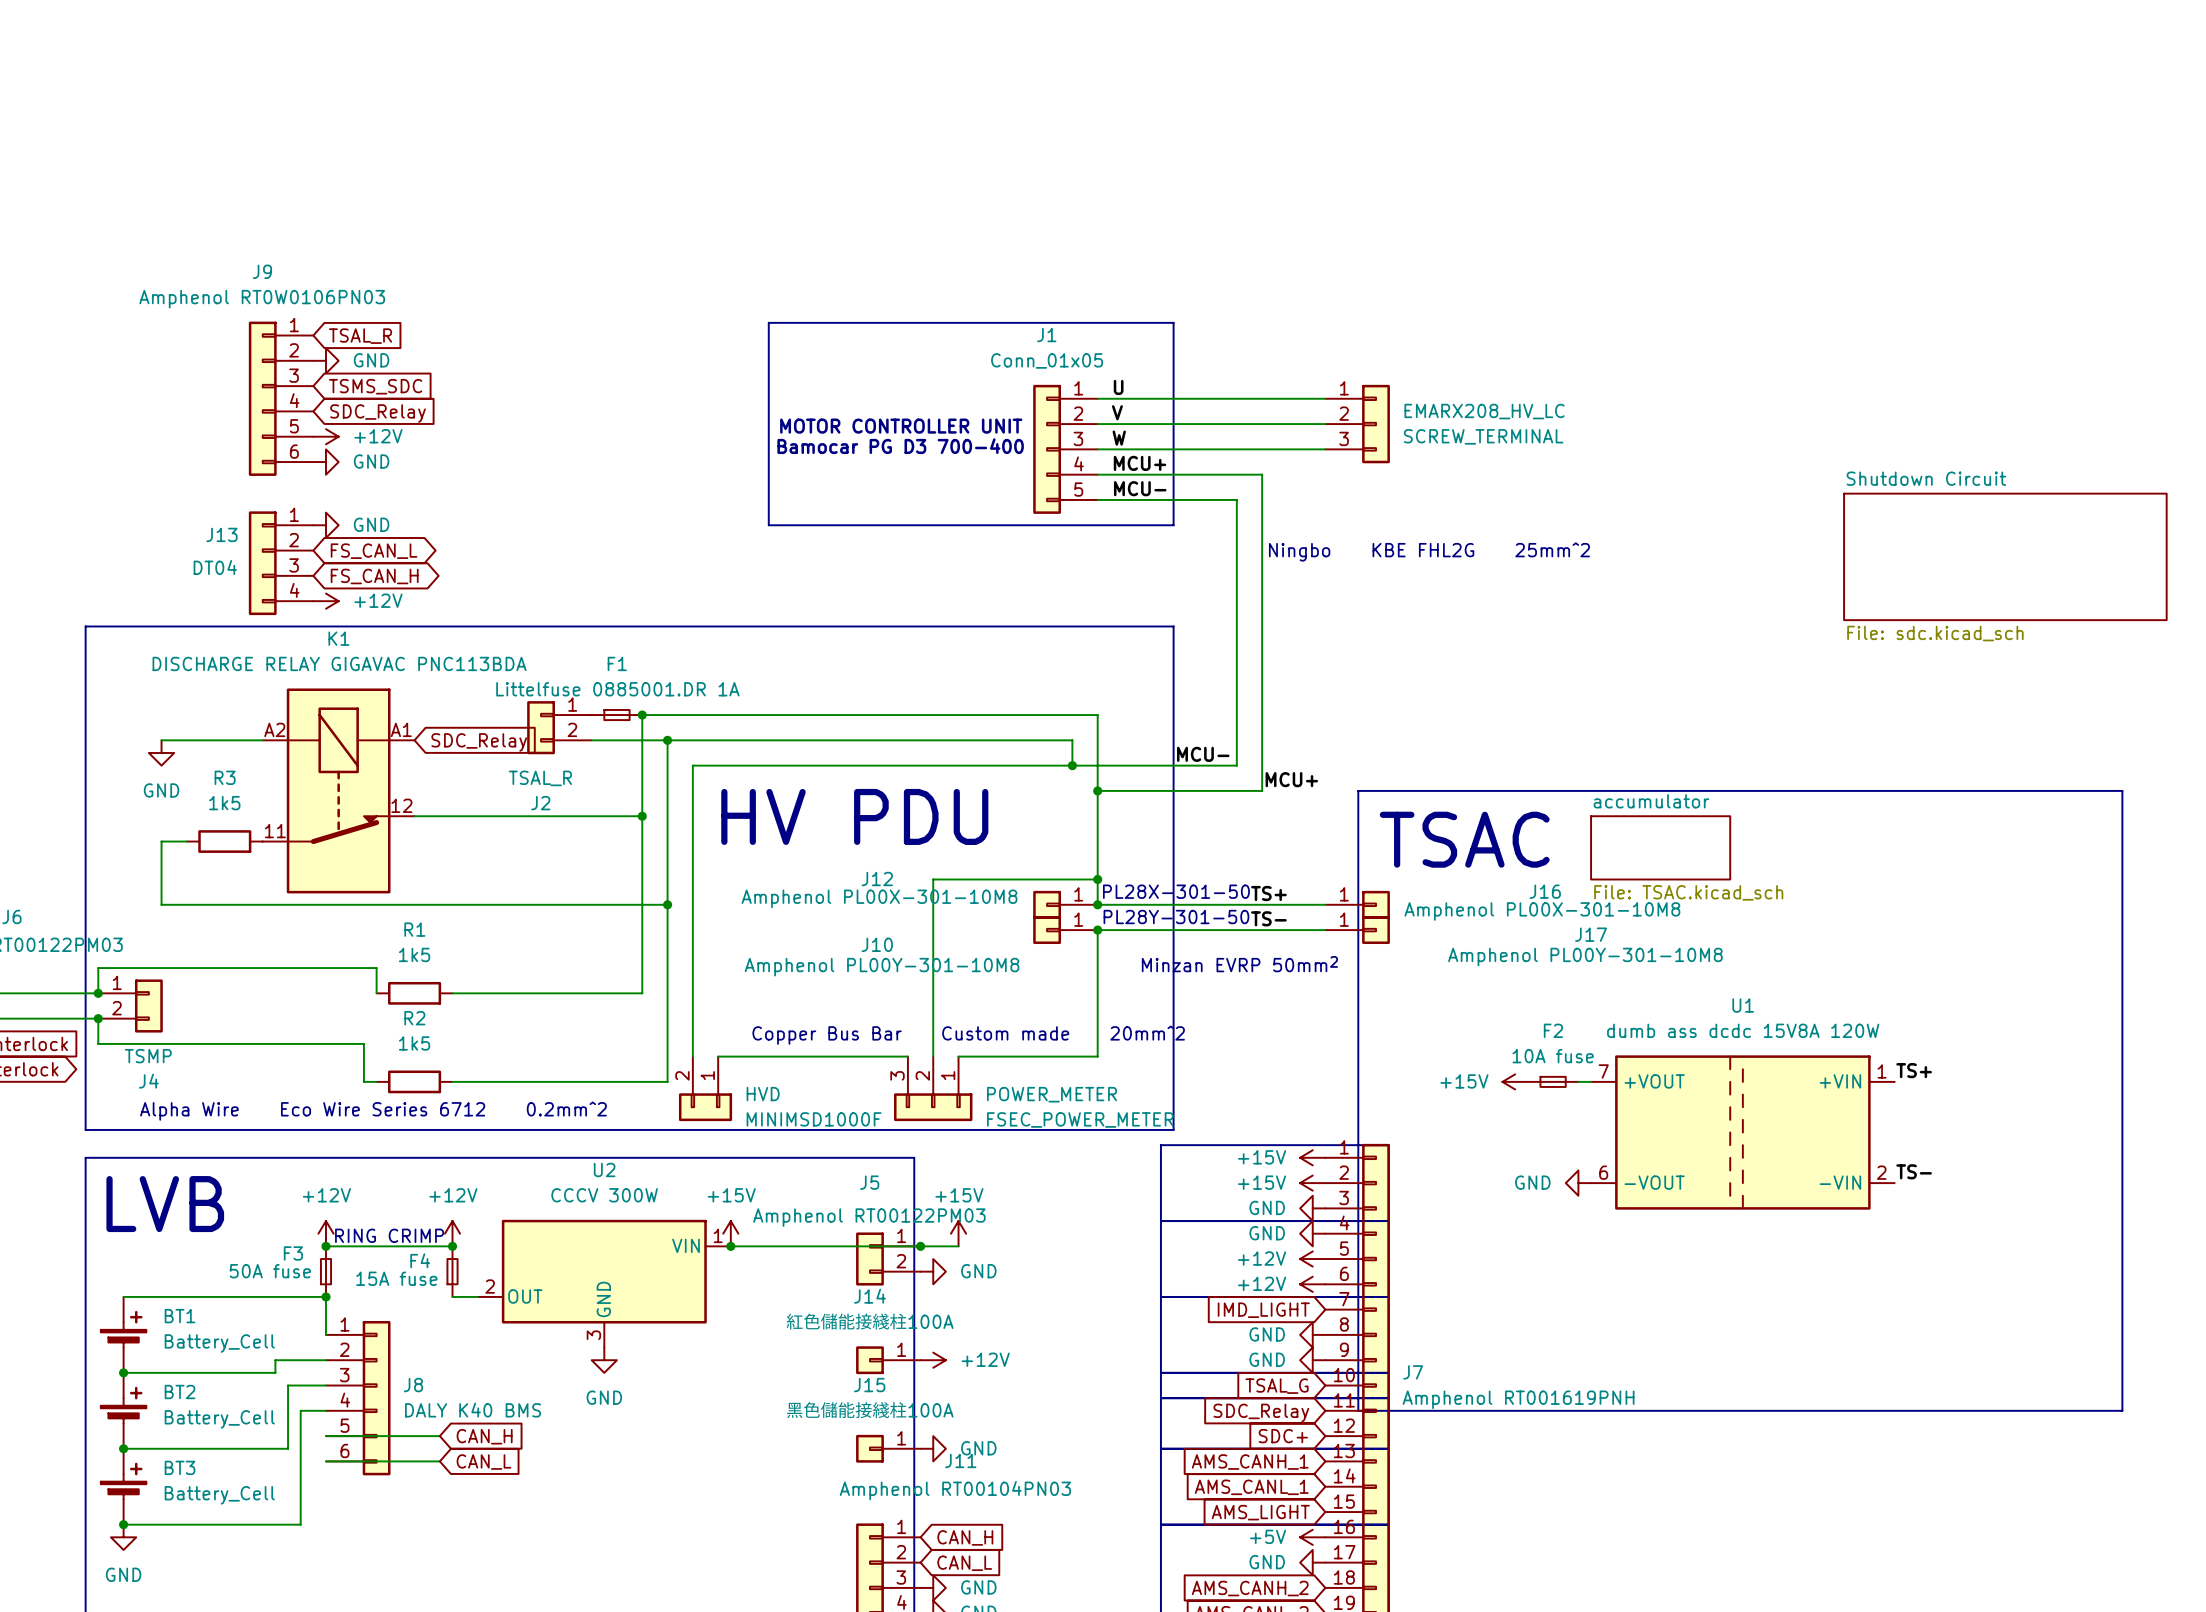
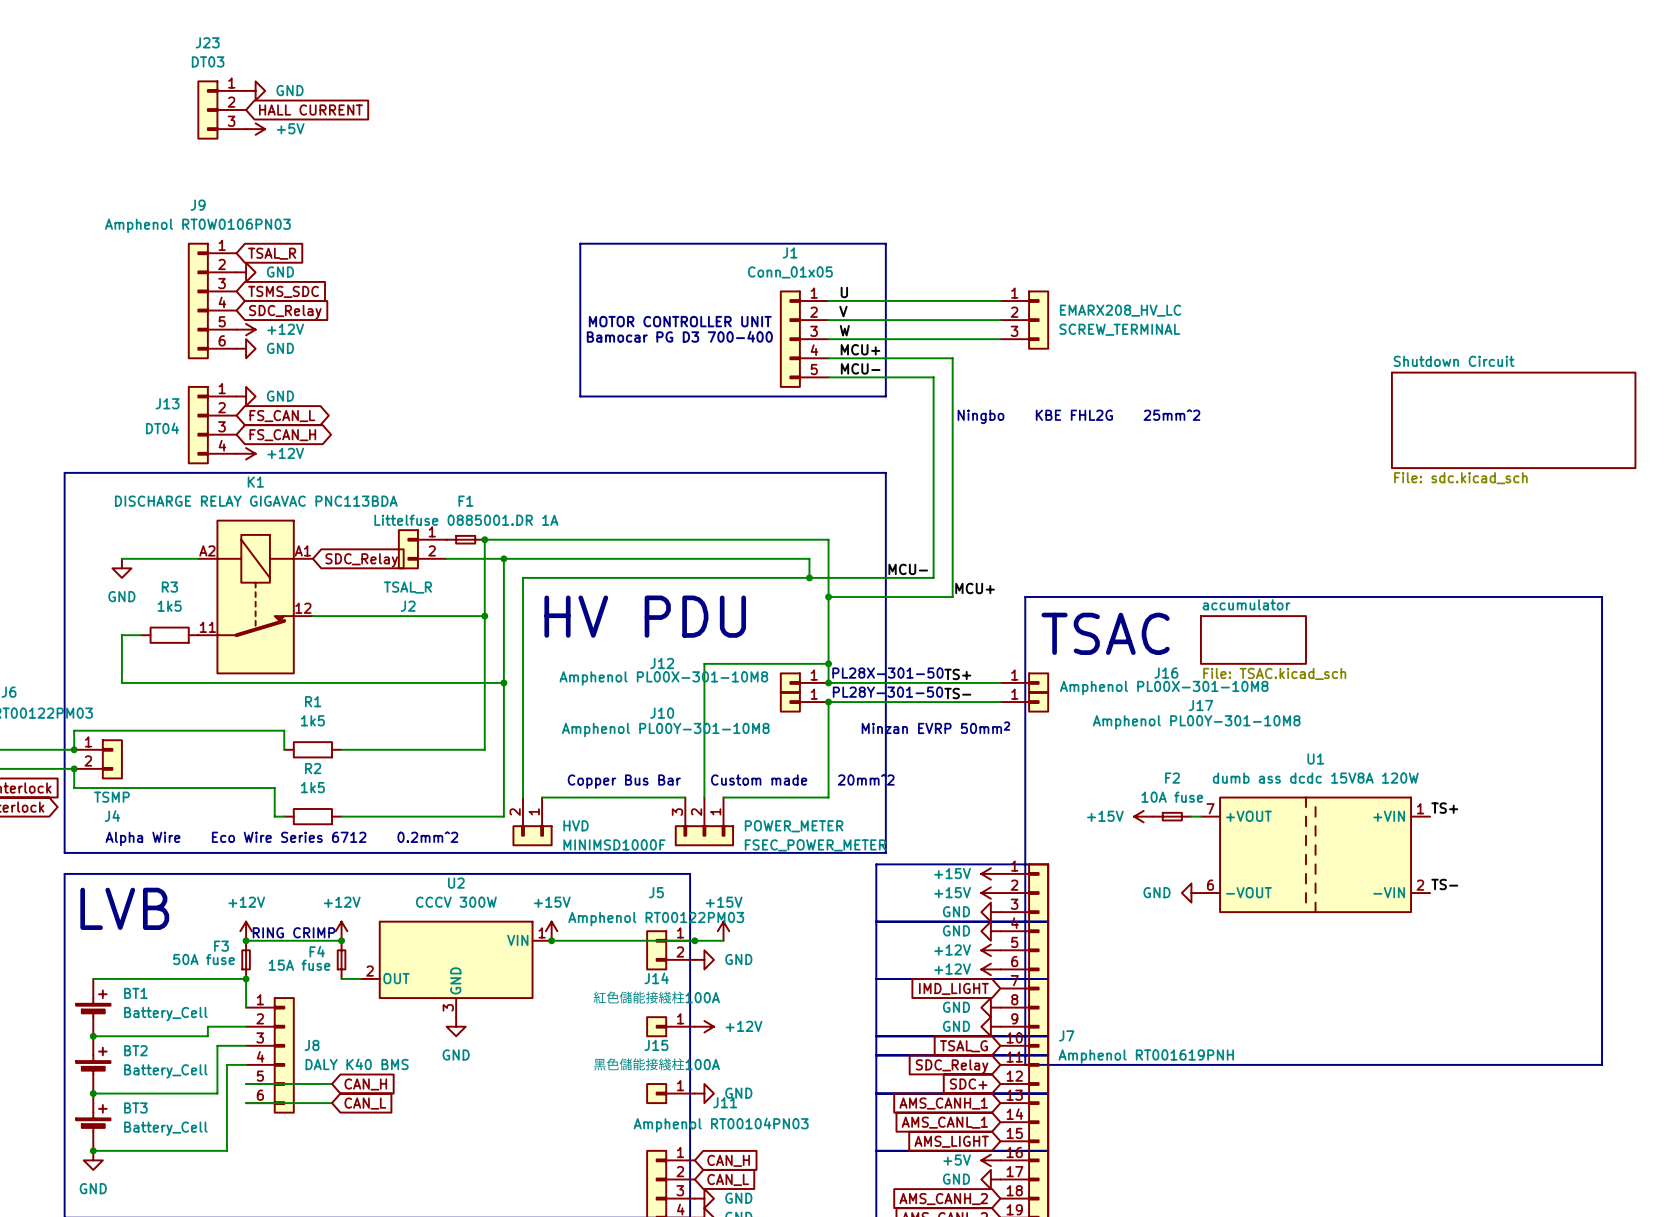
power symbol: none -> GND (255, 90)
J23: none -> DT03 (221, 110)
global label: none -> HALL CURRENT (310, 110)
power symbol: none -> +5V (255, 129)

